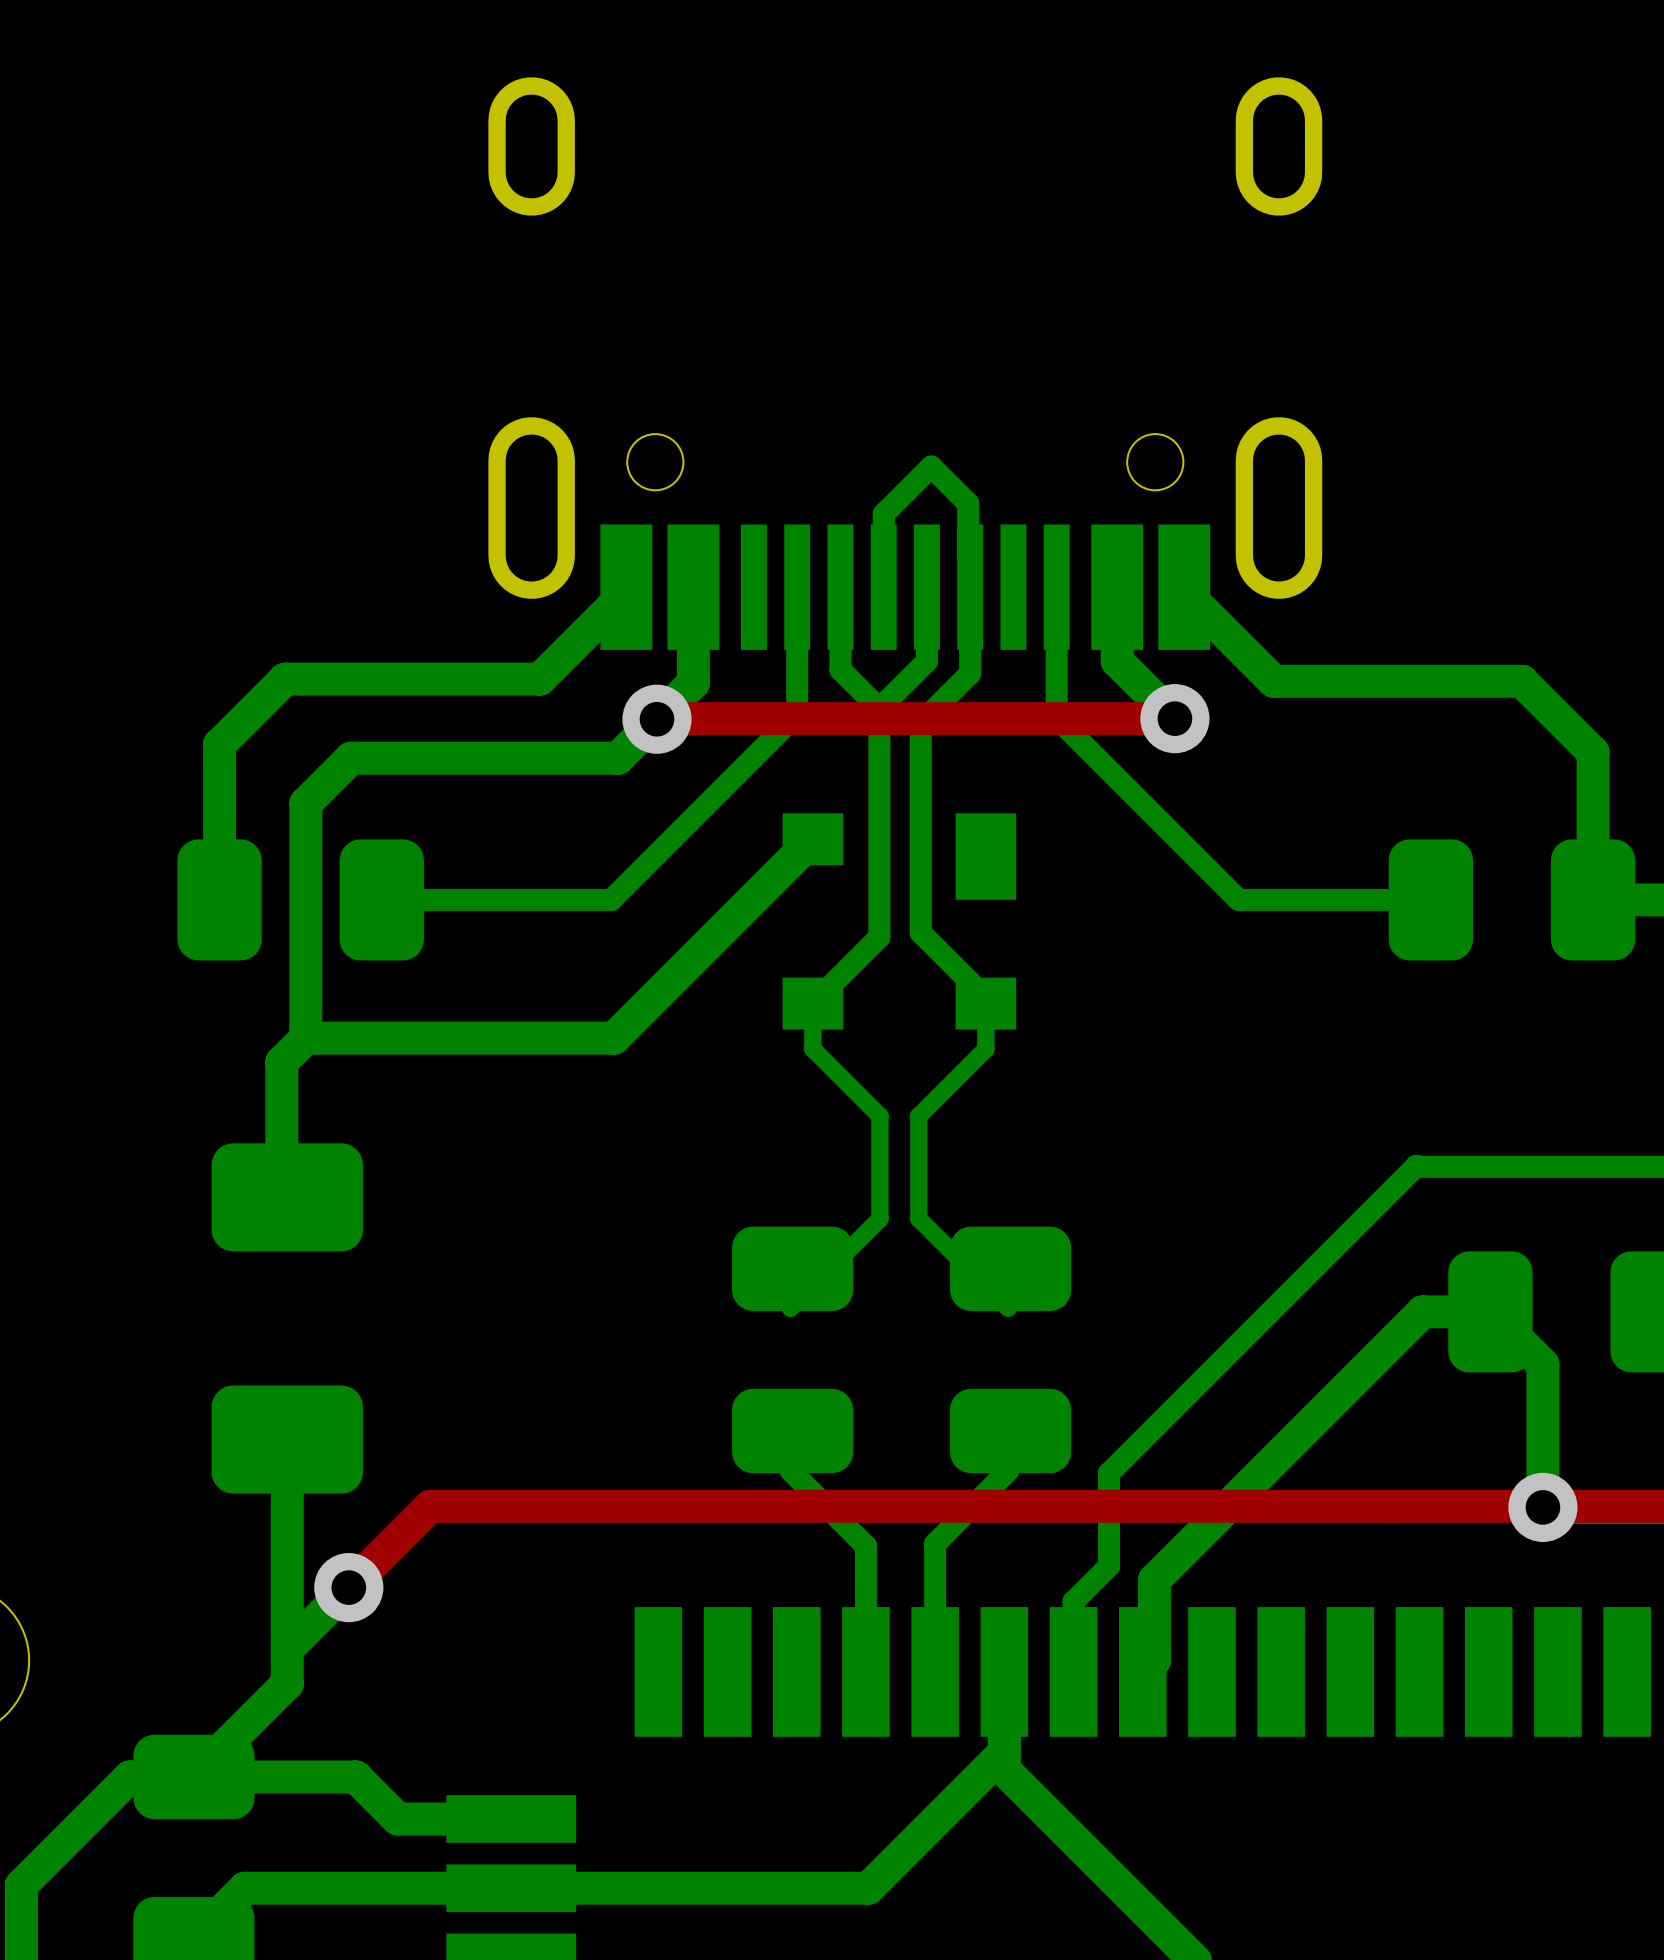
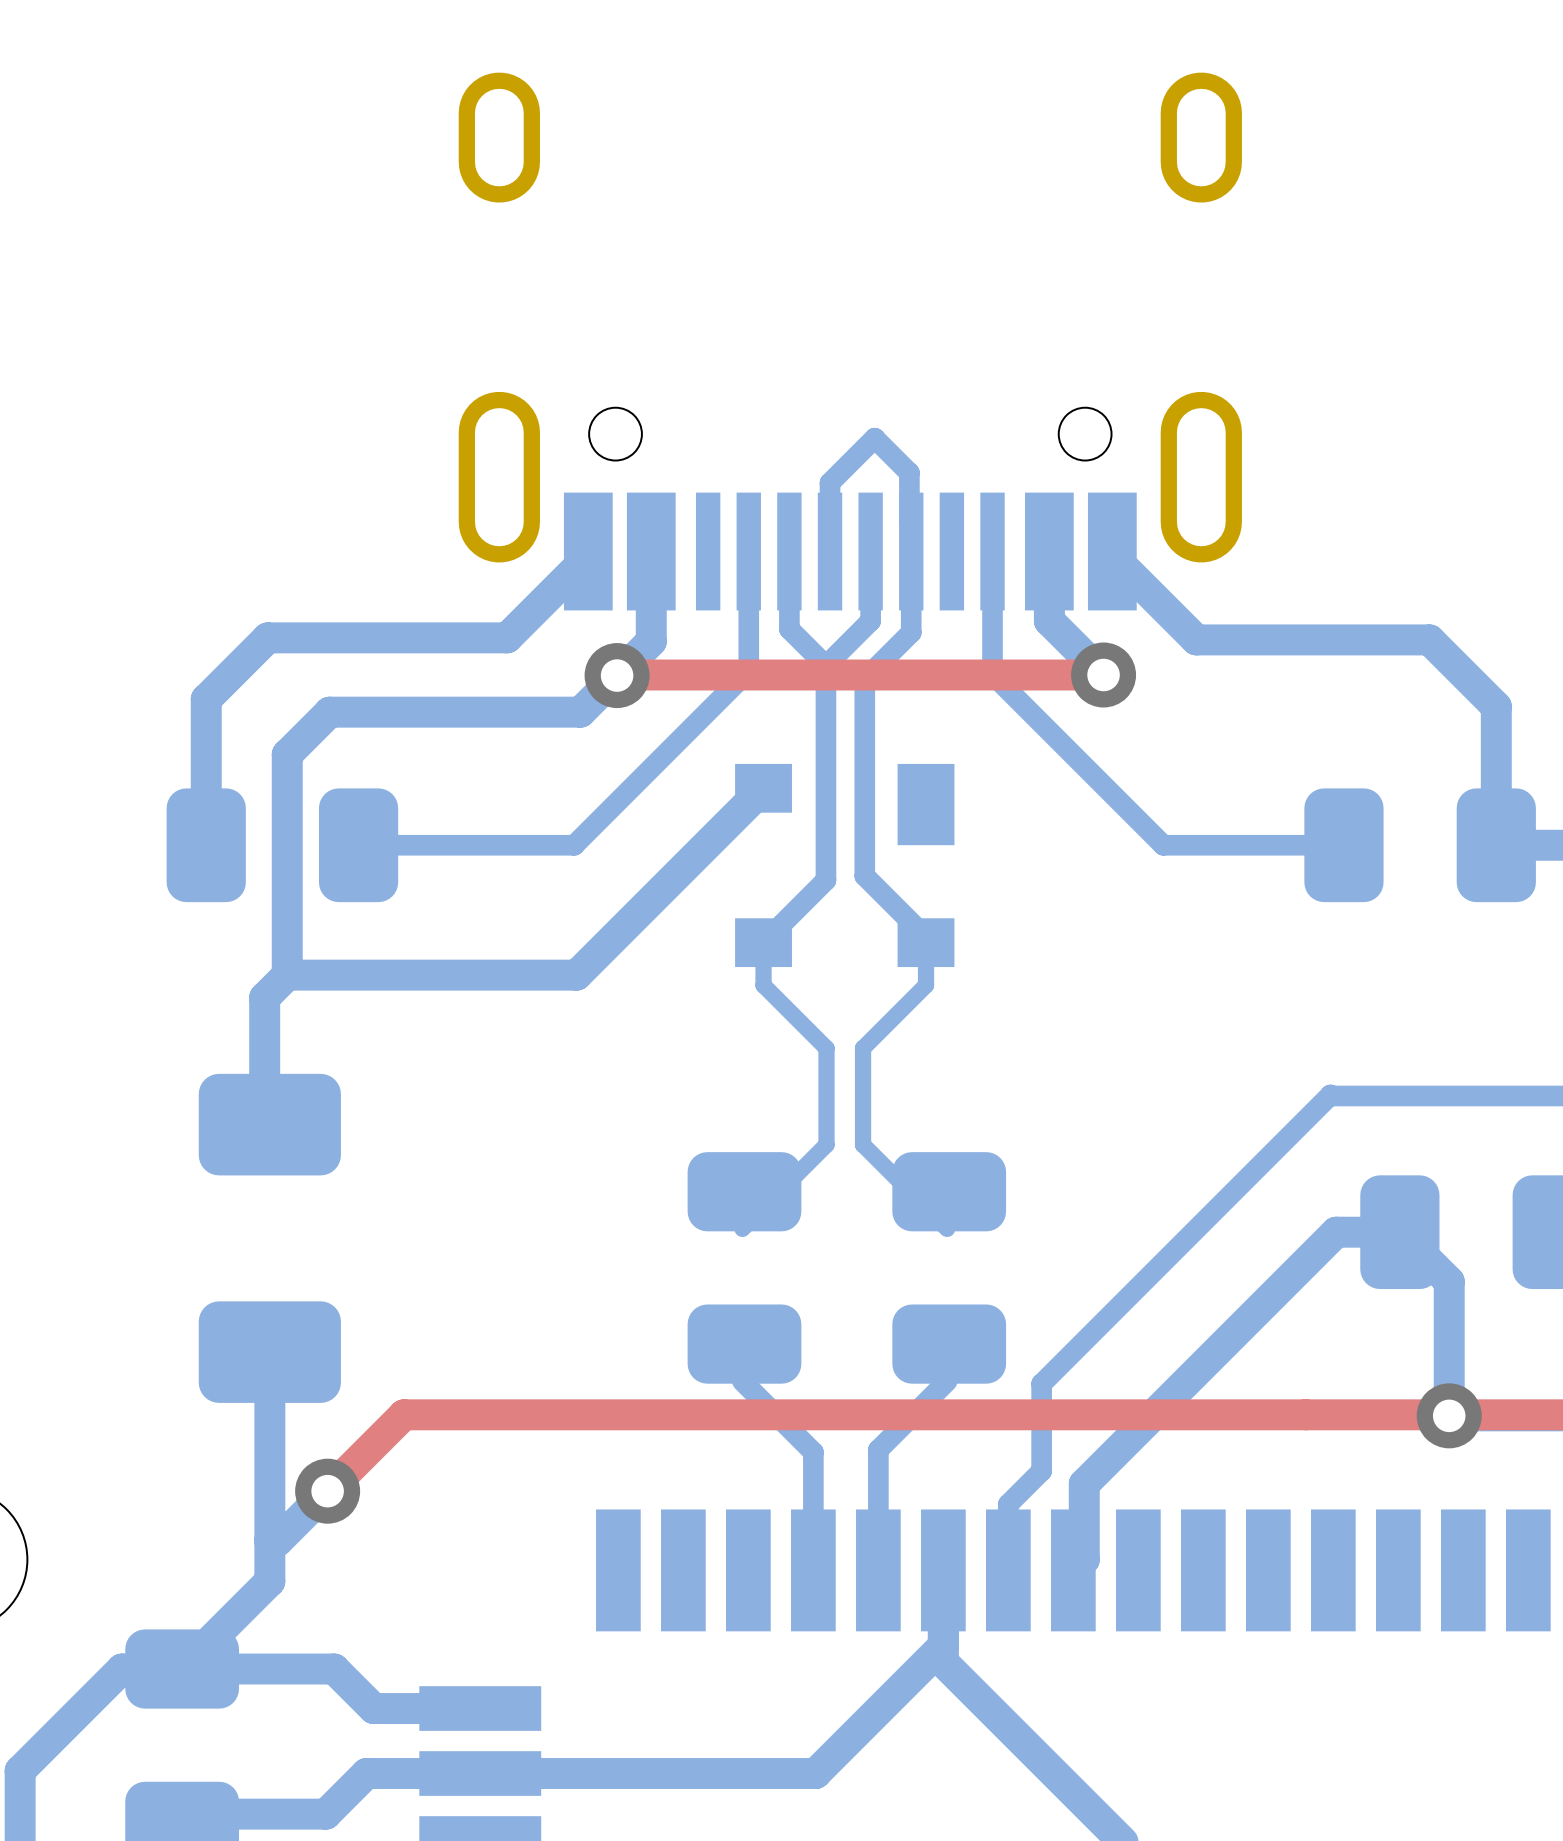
bottom track: (390, 1888) (244, 1888) (201, 1931) -> (366, 1773) (325, 1814) (189, 1814)

